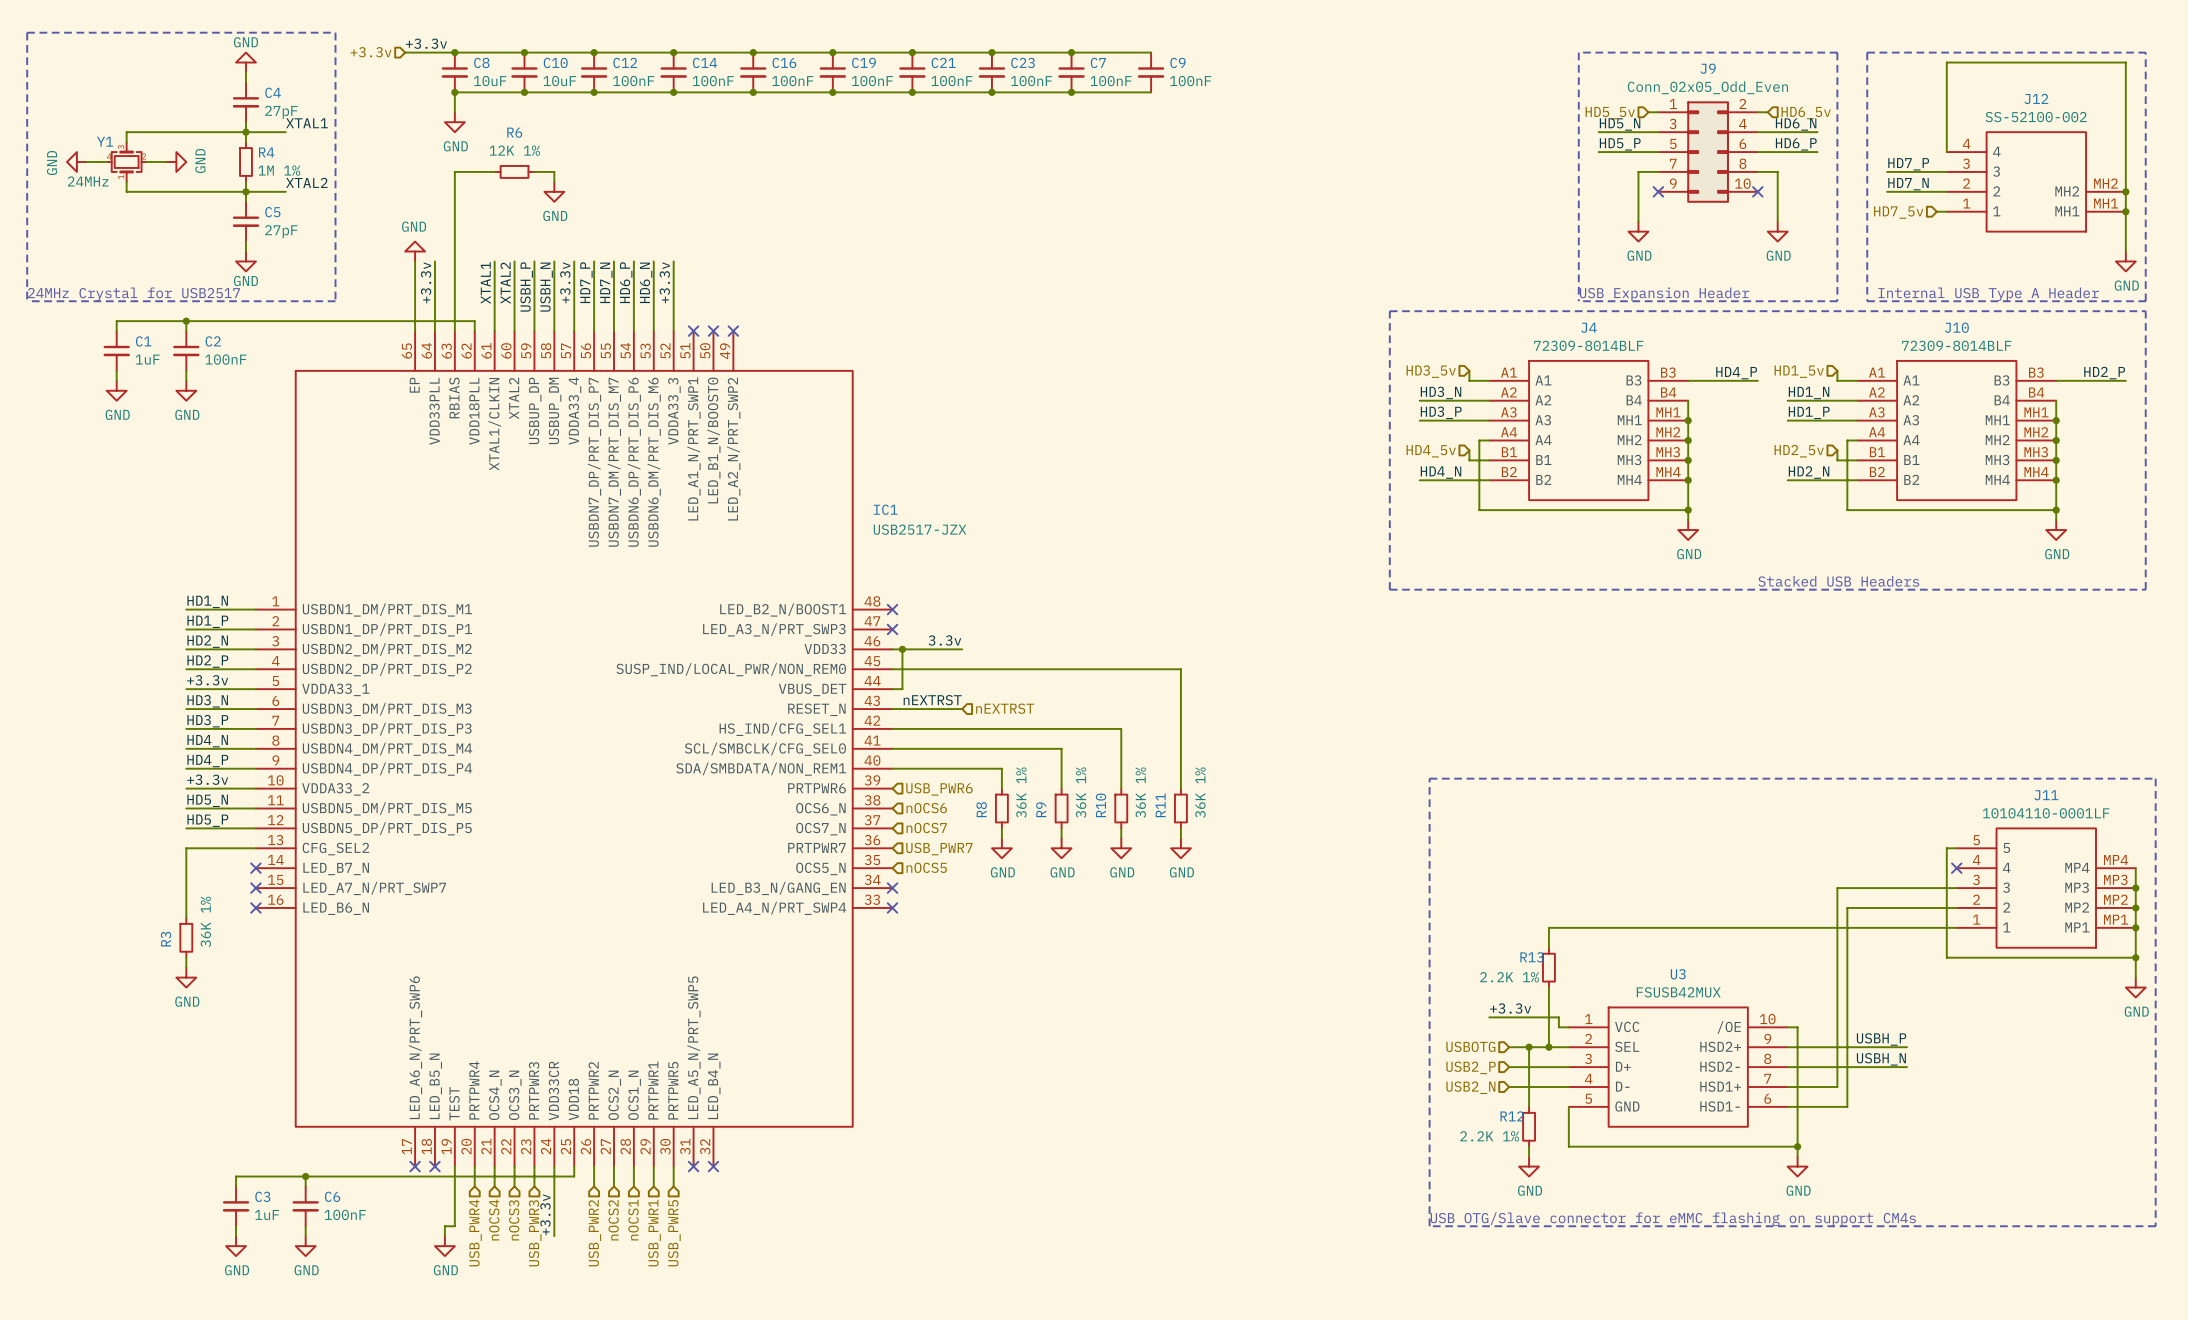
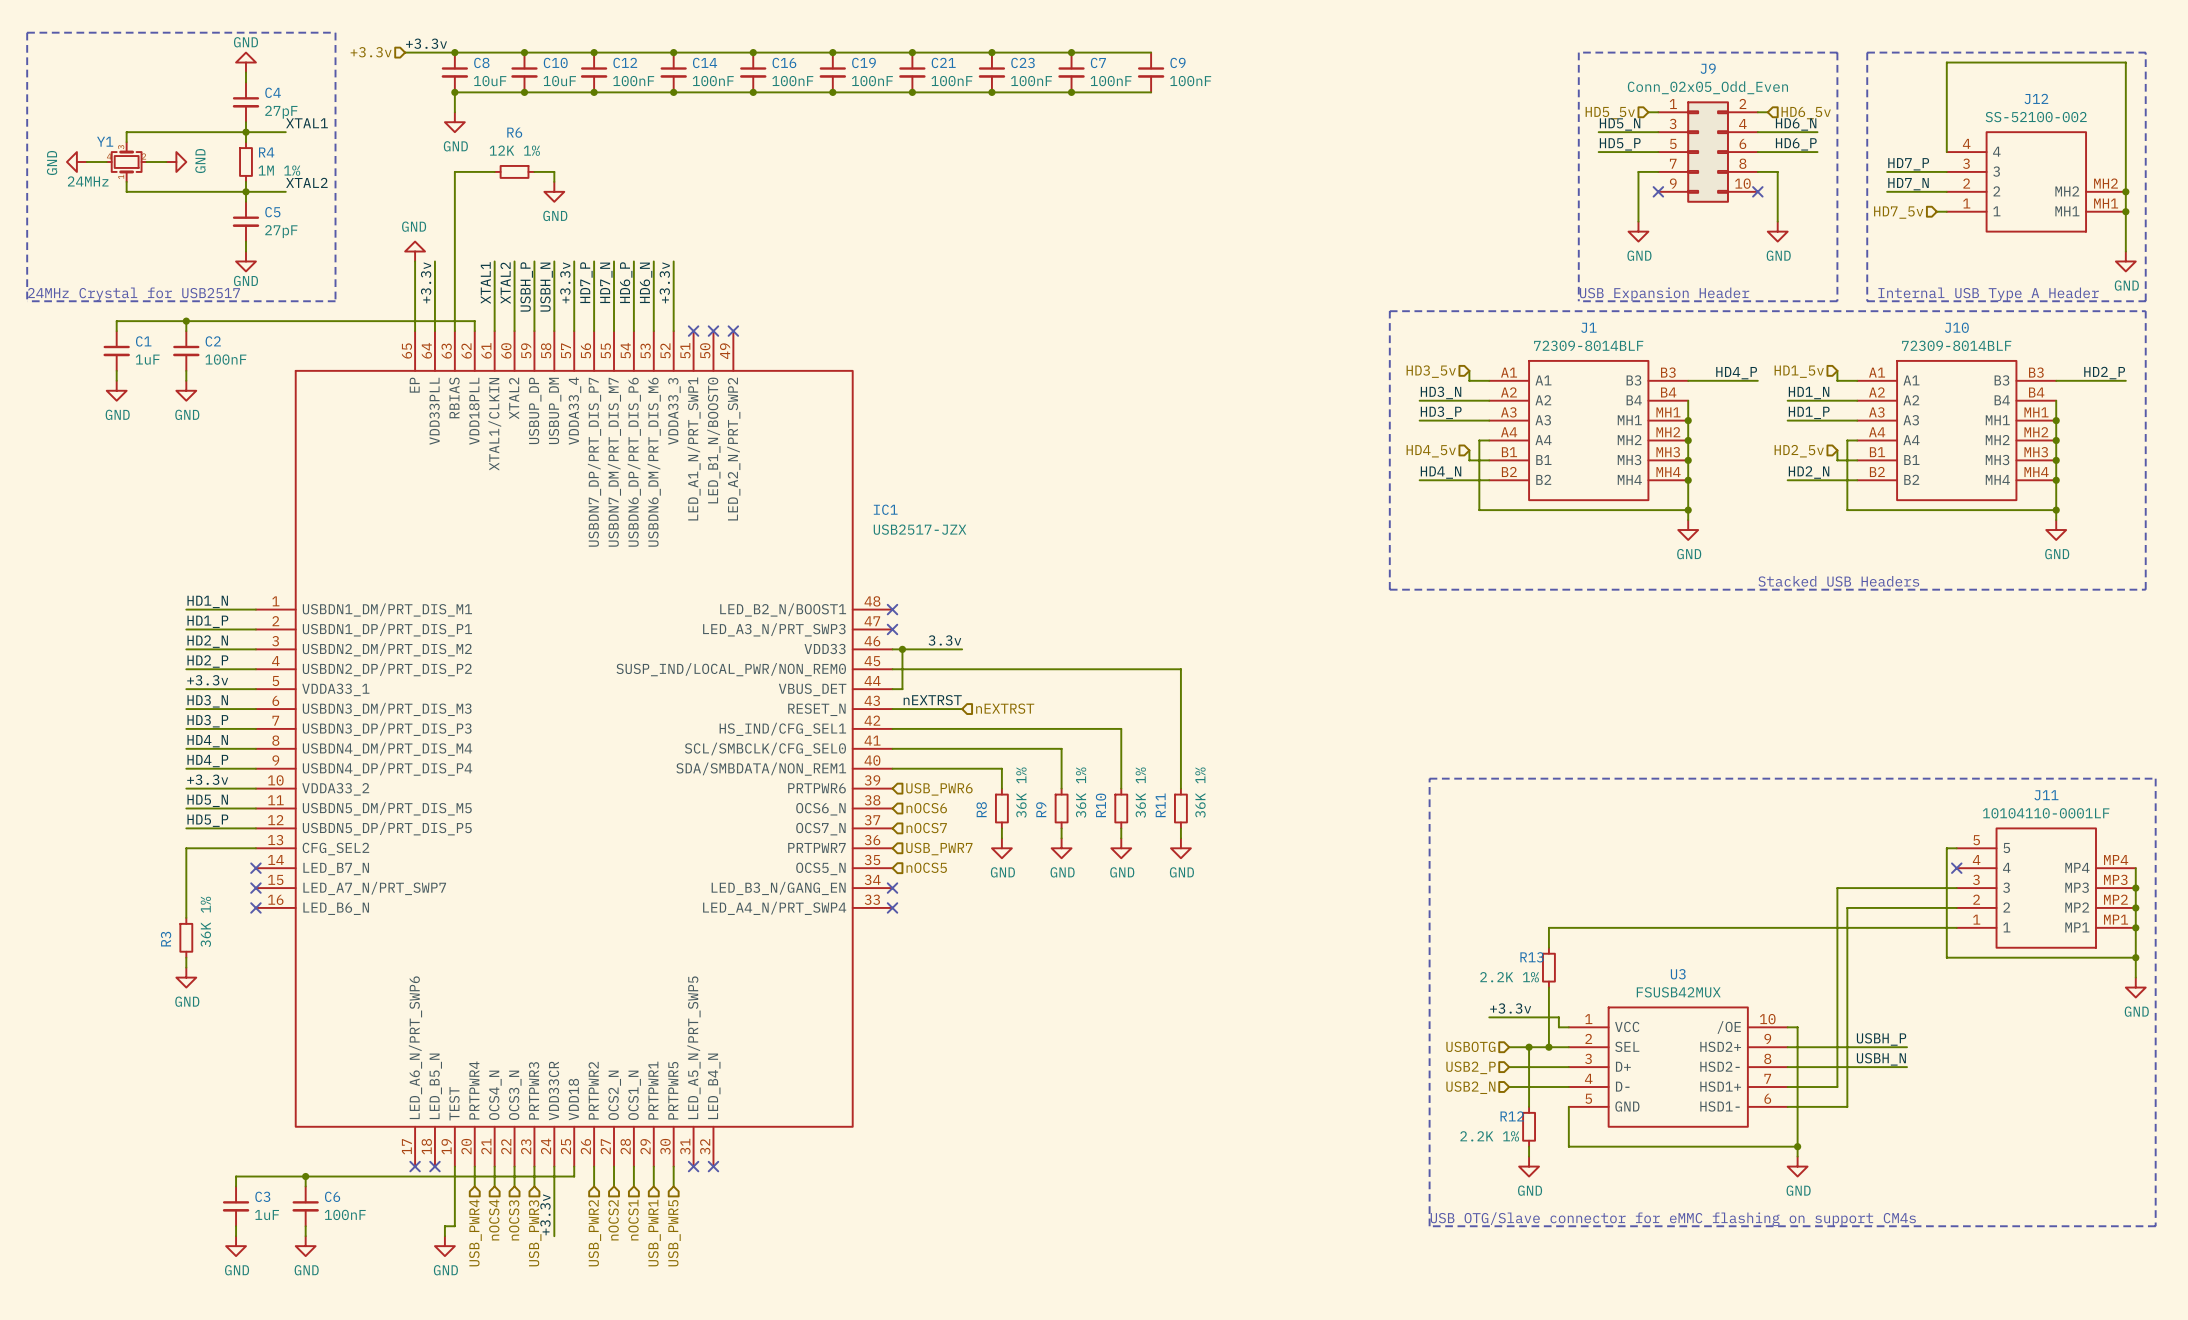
J4 name: J4 (1588, 327) -> J1 (1588, 327)

